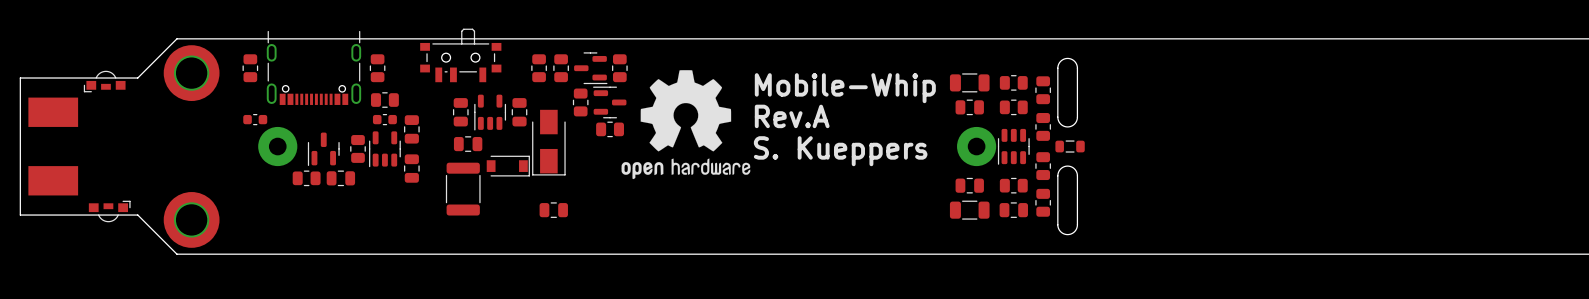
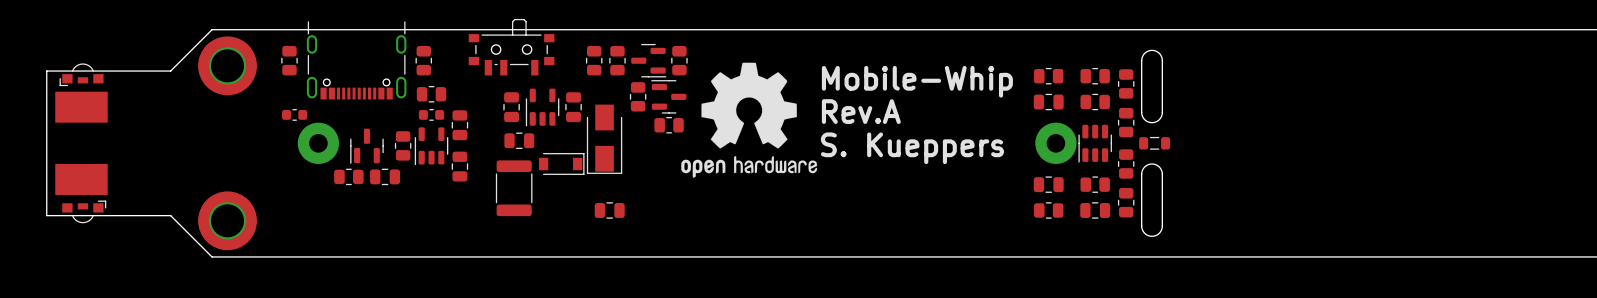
part footprint: [949, 73, 990, 93] -> [1033, 67, 1064, 85]
part position: (104, 81) -> (81, 74)
part footprint: [949, 200, 990, 220] -> [1033, 202, 1064, 219]
part position: (109, 211) -> (84, 211)

